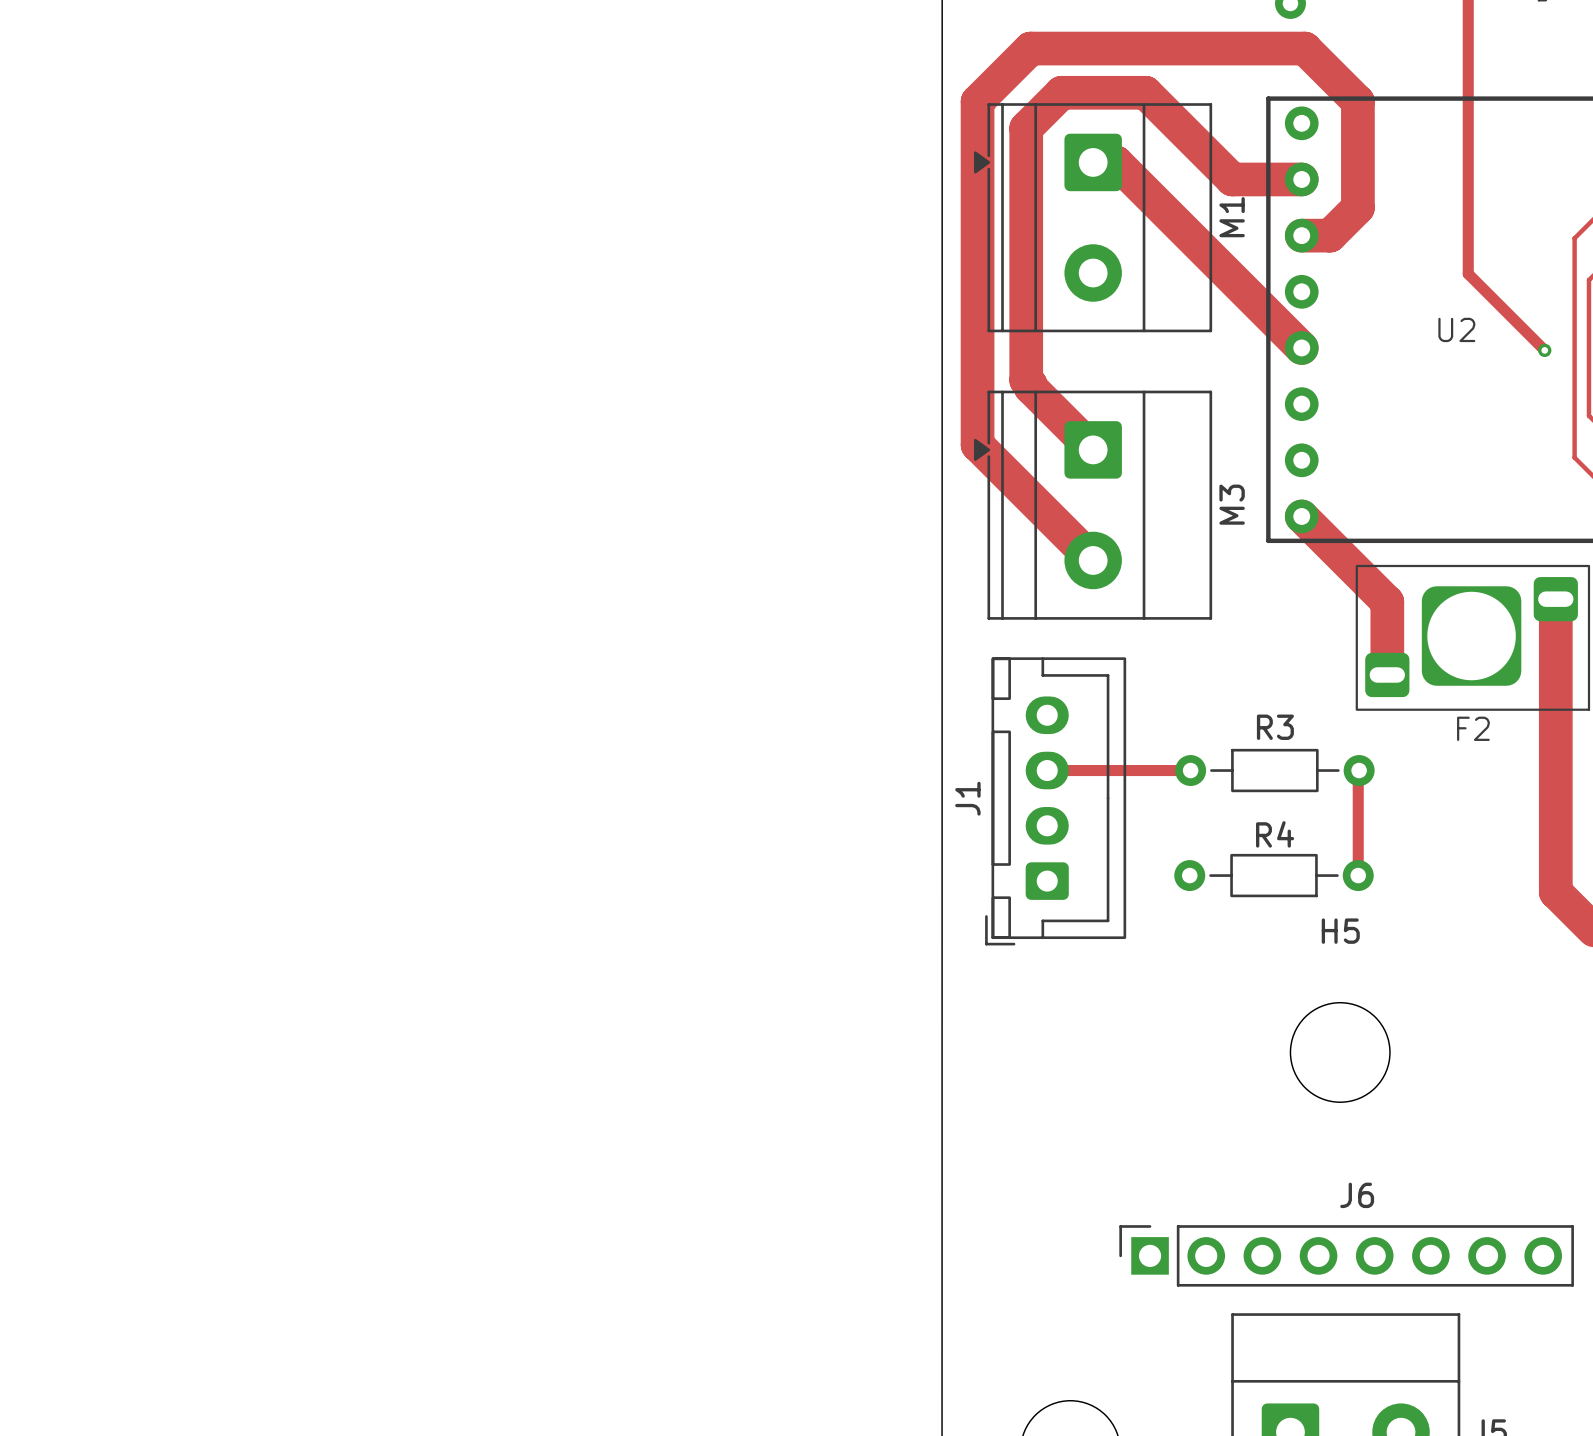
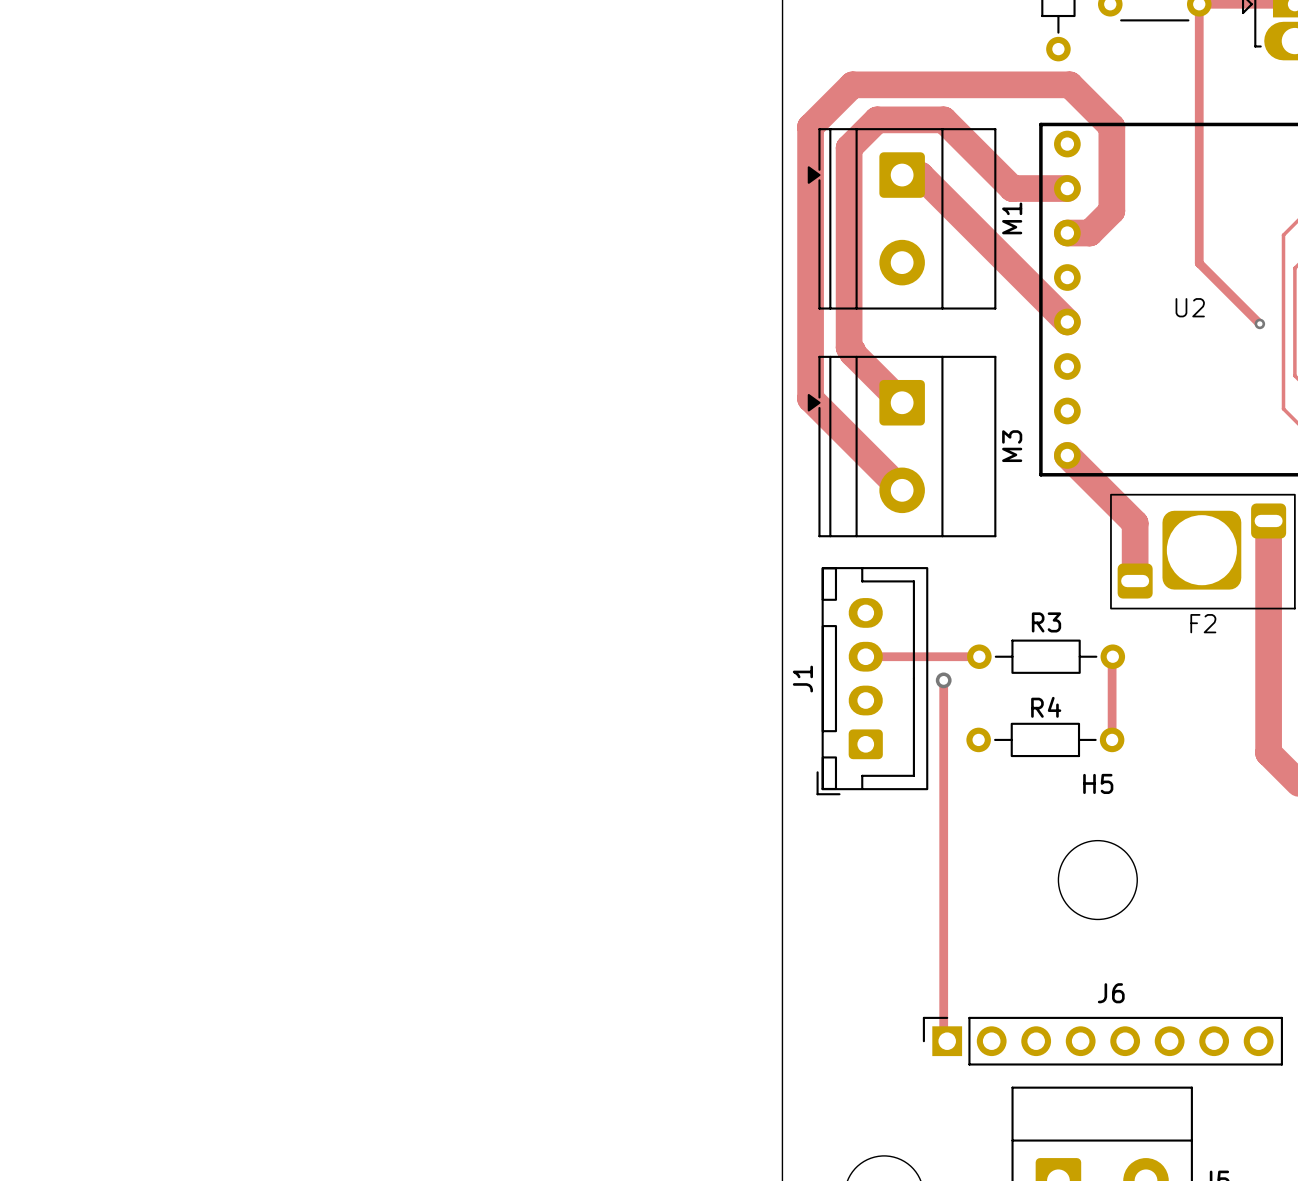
track: none -> (943, 680) (943, 1037) (947, 1041)
via: none -> (943, 680)

